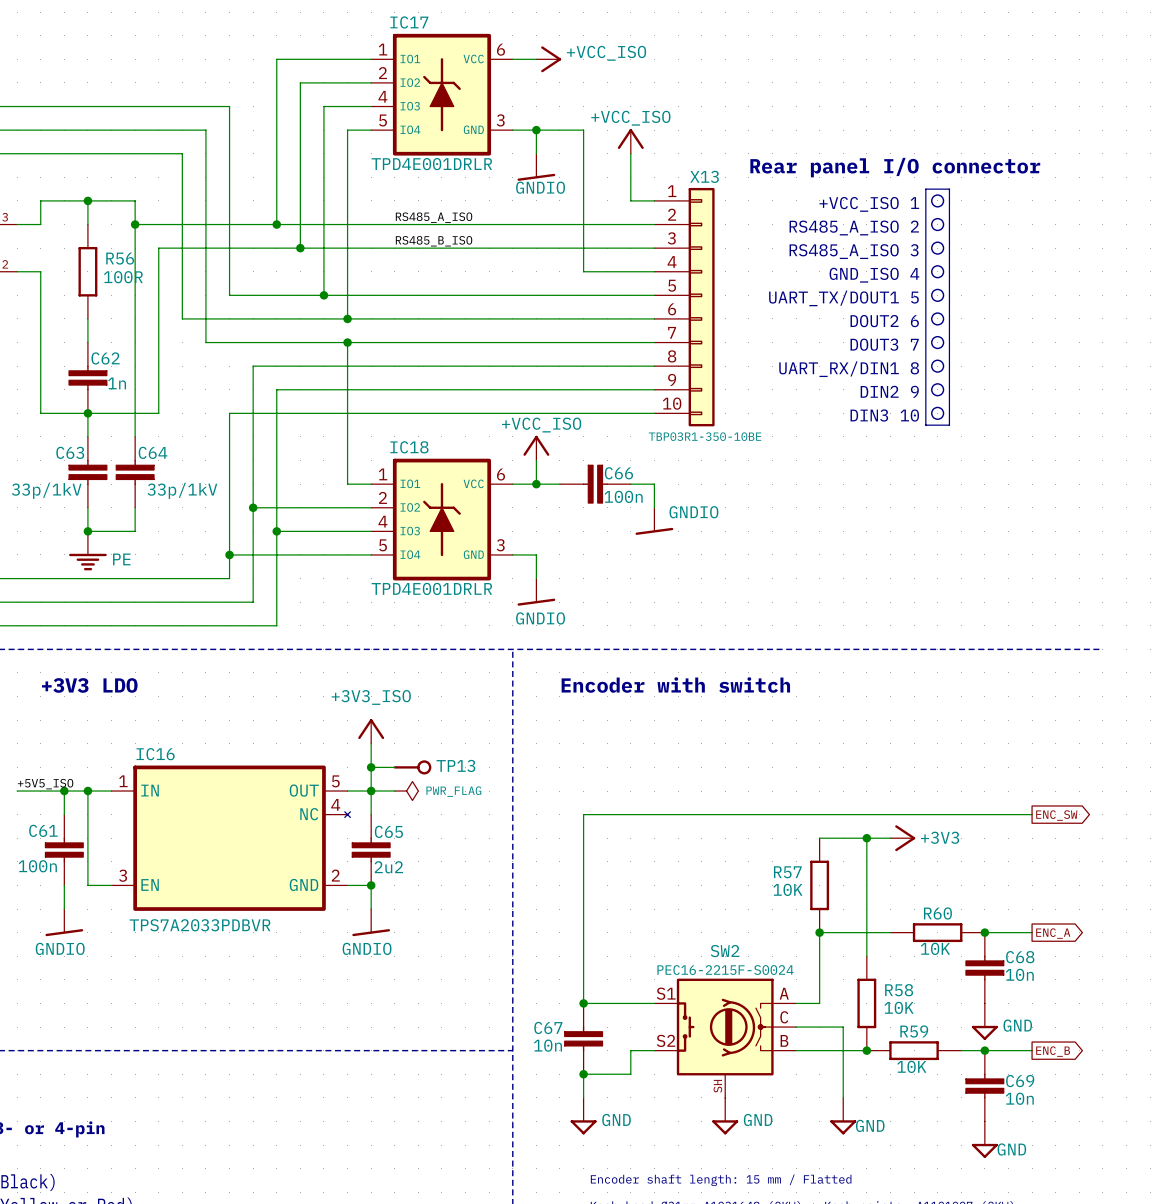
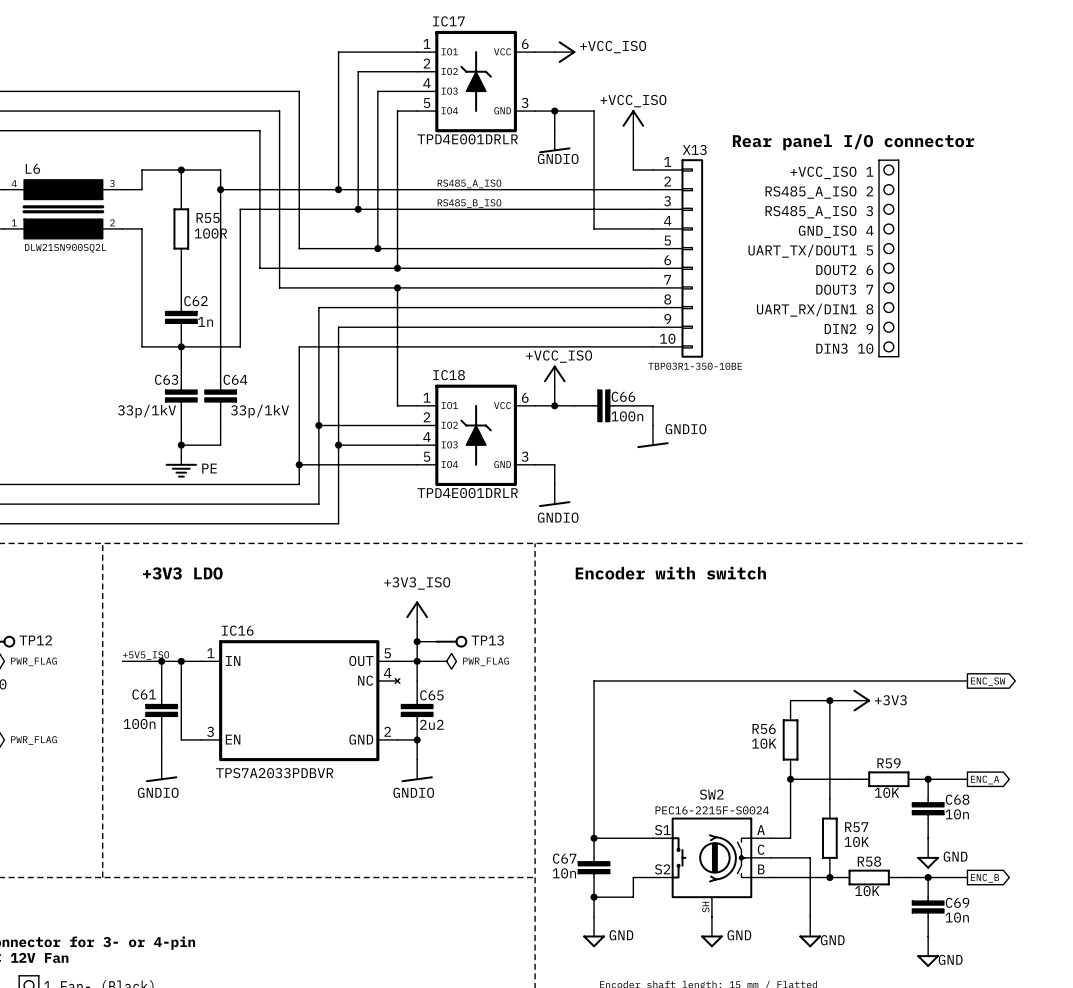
R56 name: R56 (120, 258) -> R55 (208, 218)
R57 name: R57 (787, 872) -> R56 (764, 729)
R60 name: R60 (937, 913) -> R59 (889, 763)
R58 name: R58 (899, 990) -> R57 (856, 827)
R59 name: R59 (914, 1031) -> R58 (869, 861)

